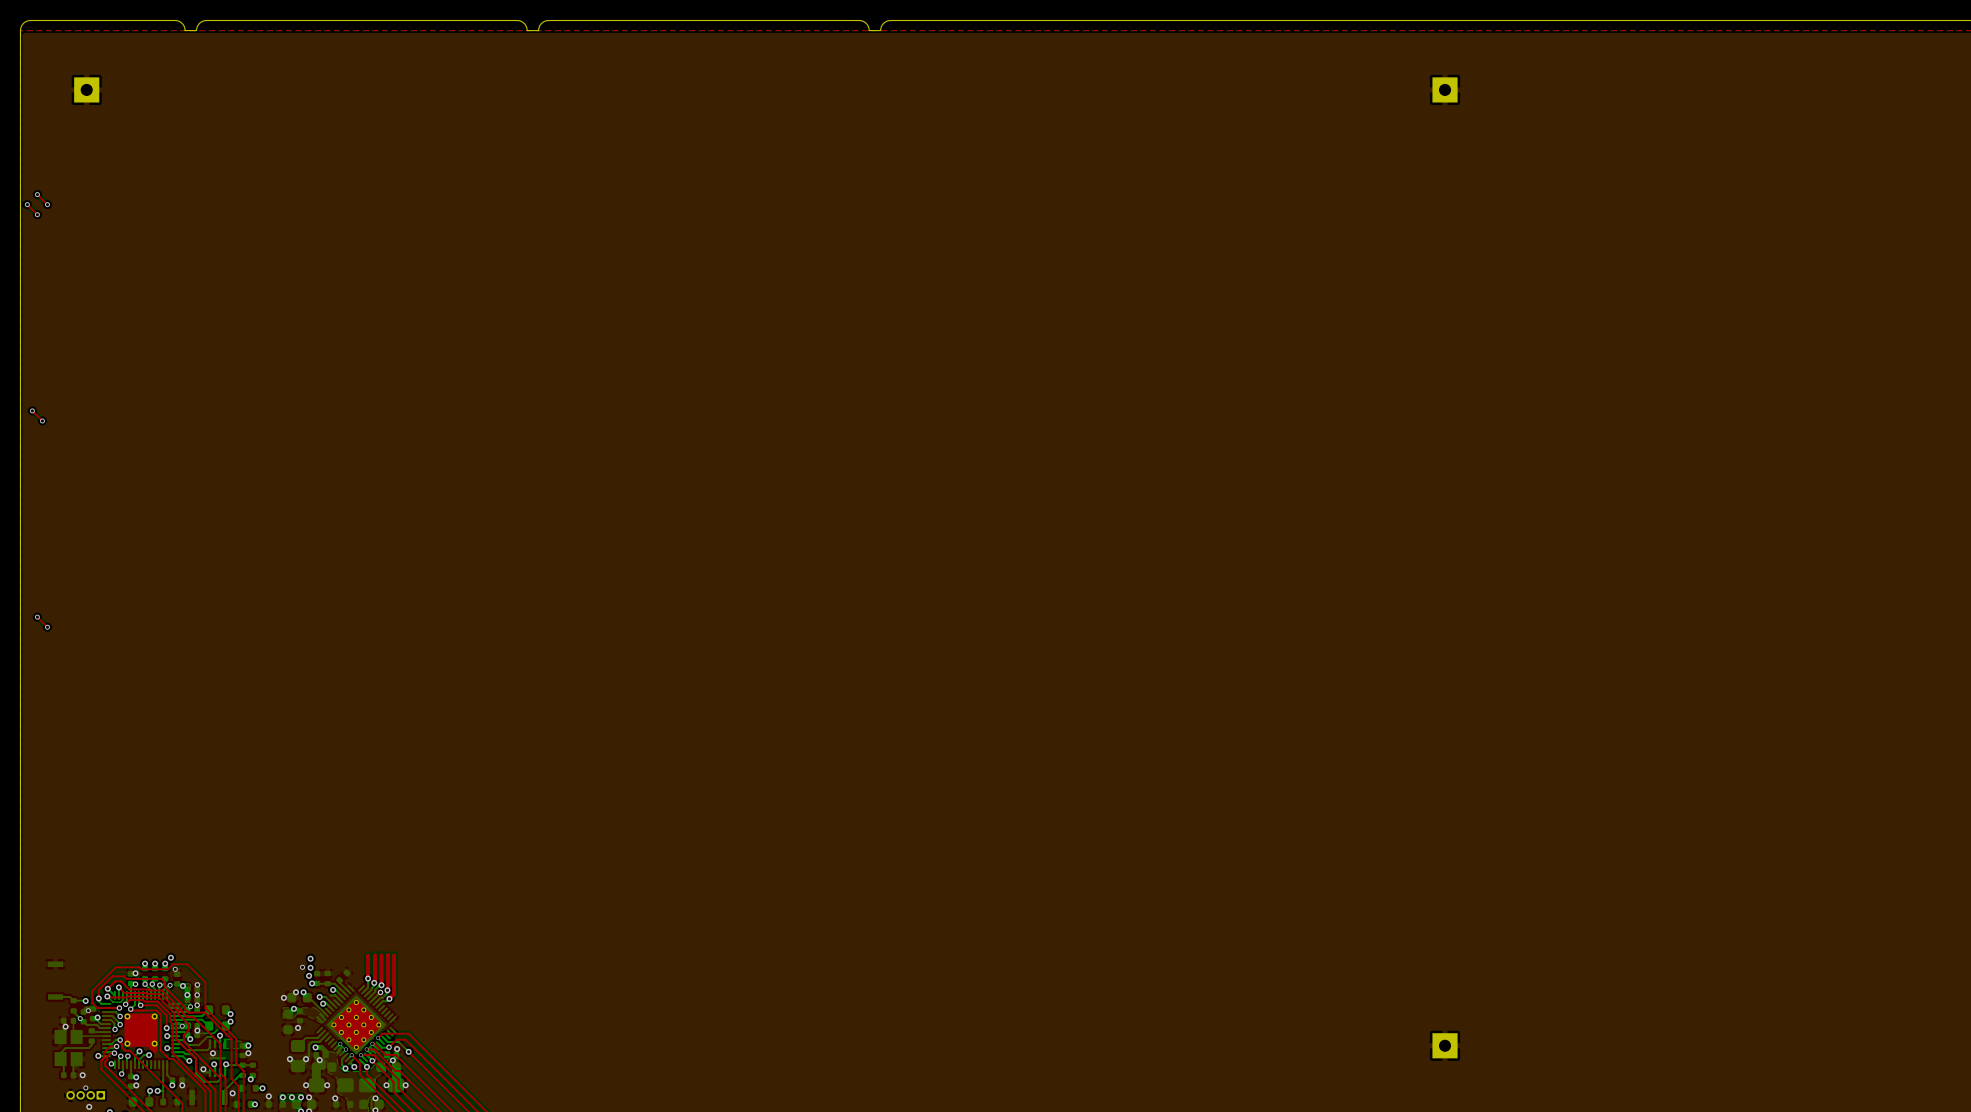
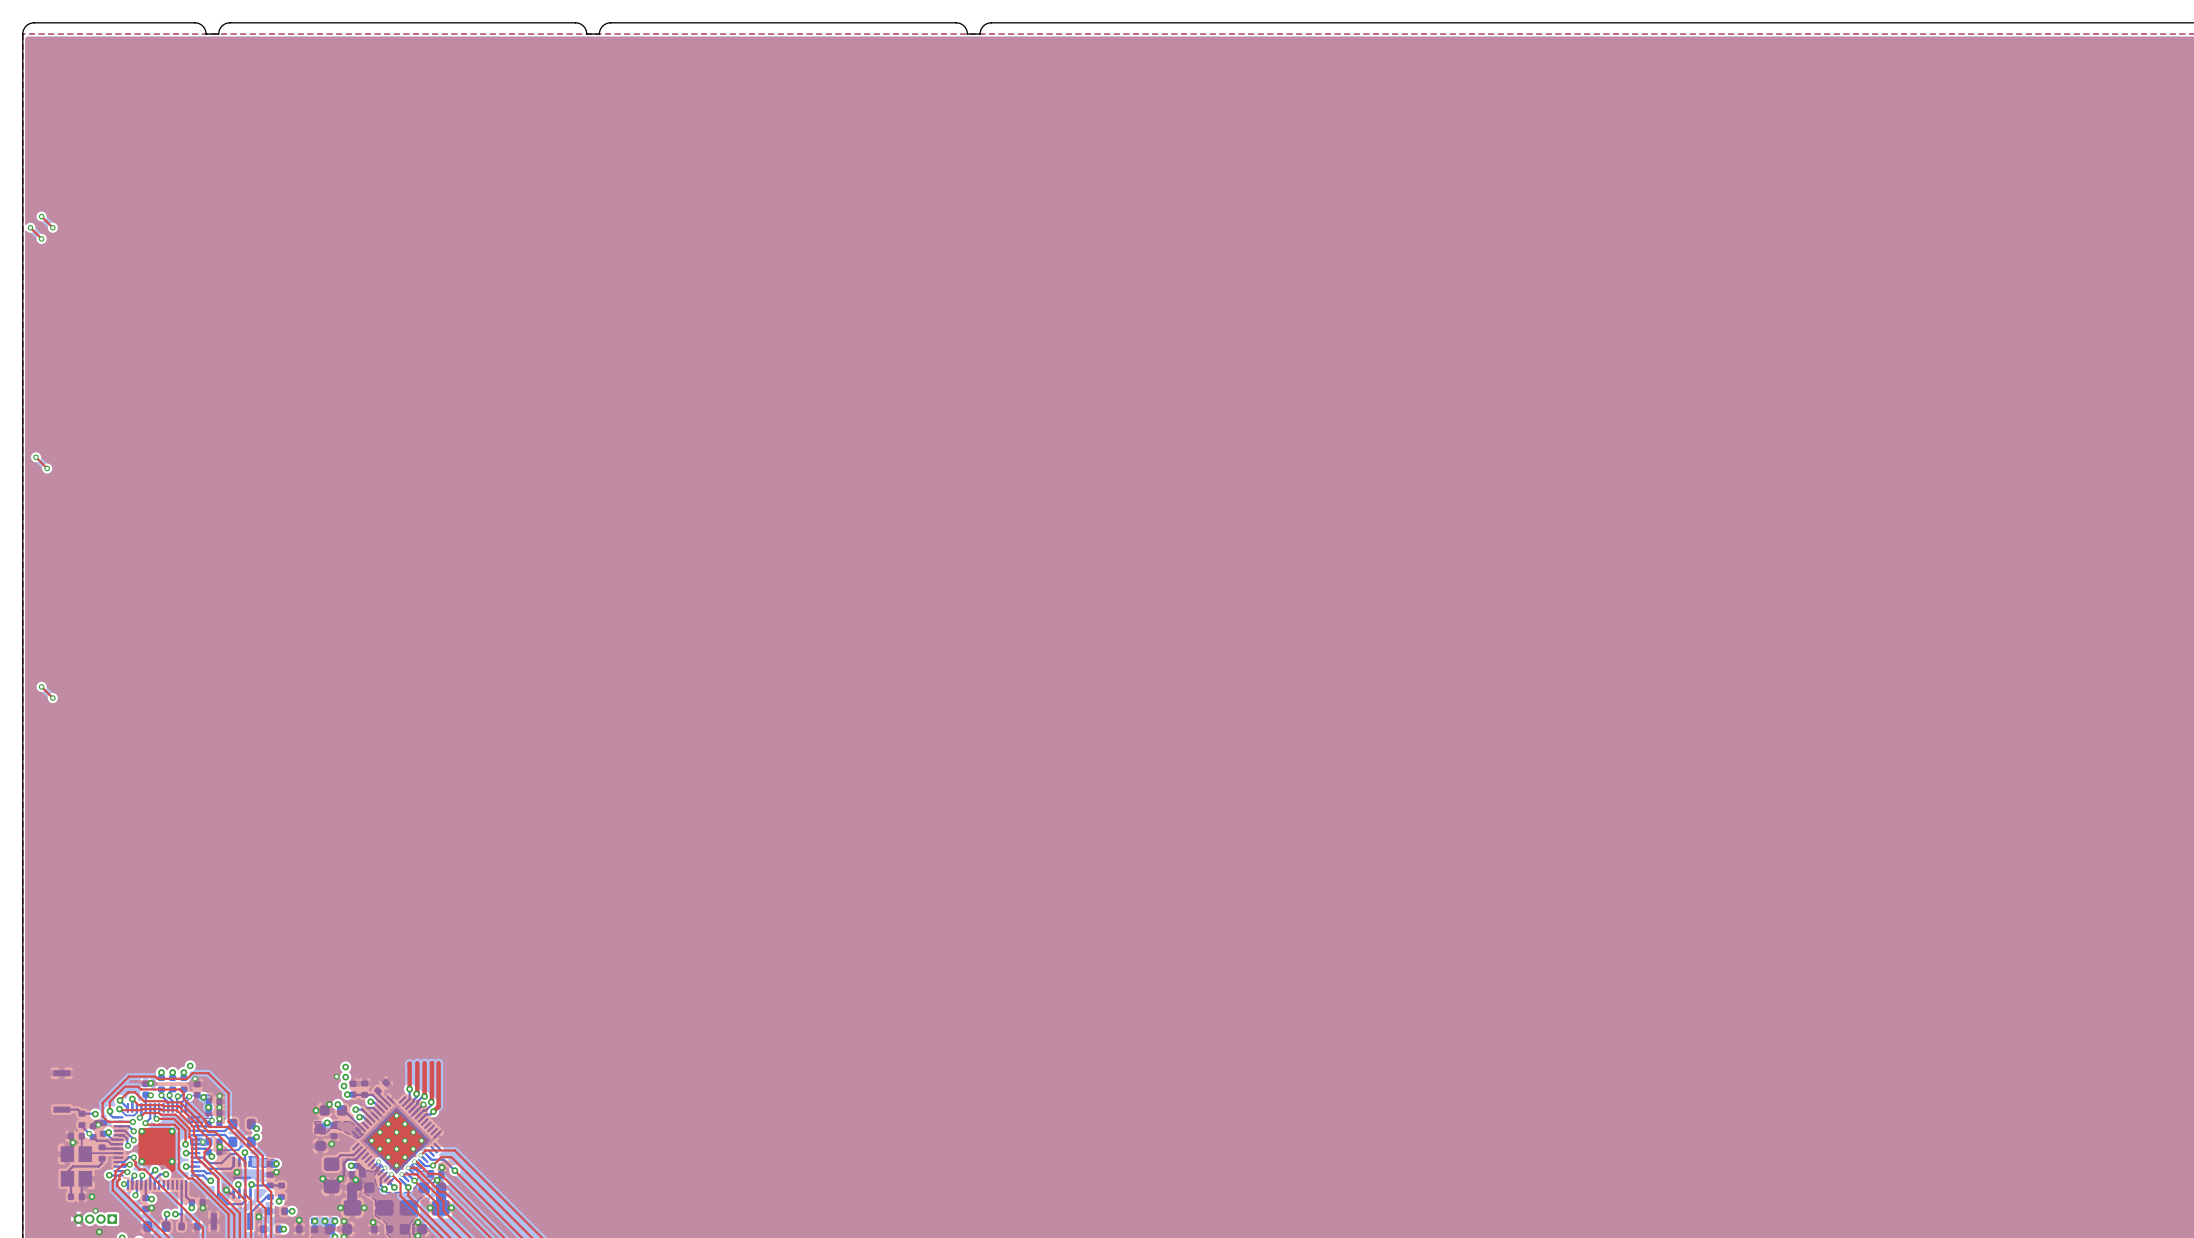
part: (86, 89) -> none
part: (1445, 89) -> none
part: (1445, 1045) -> none

